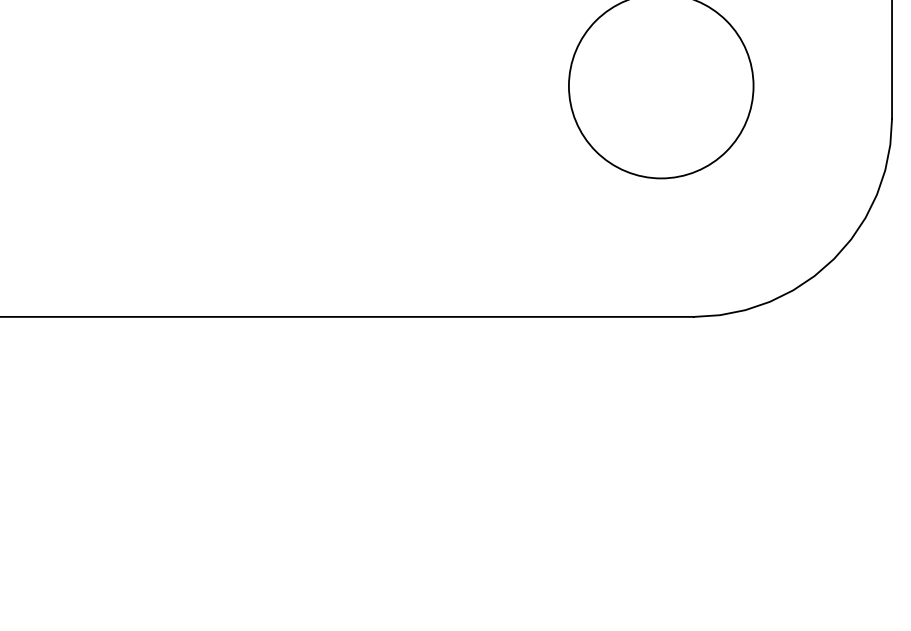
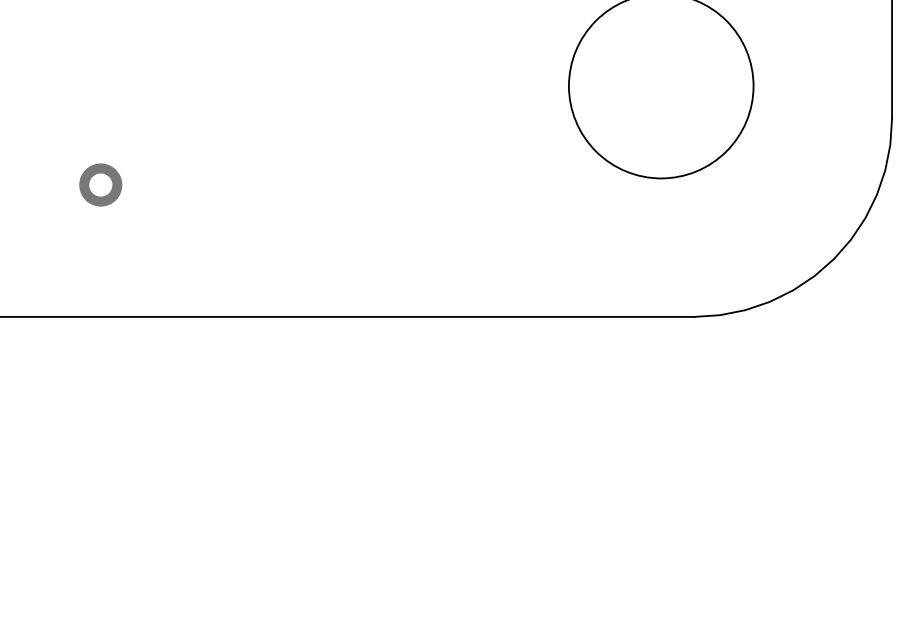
via: none -> (100, 185)

